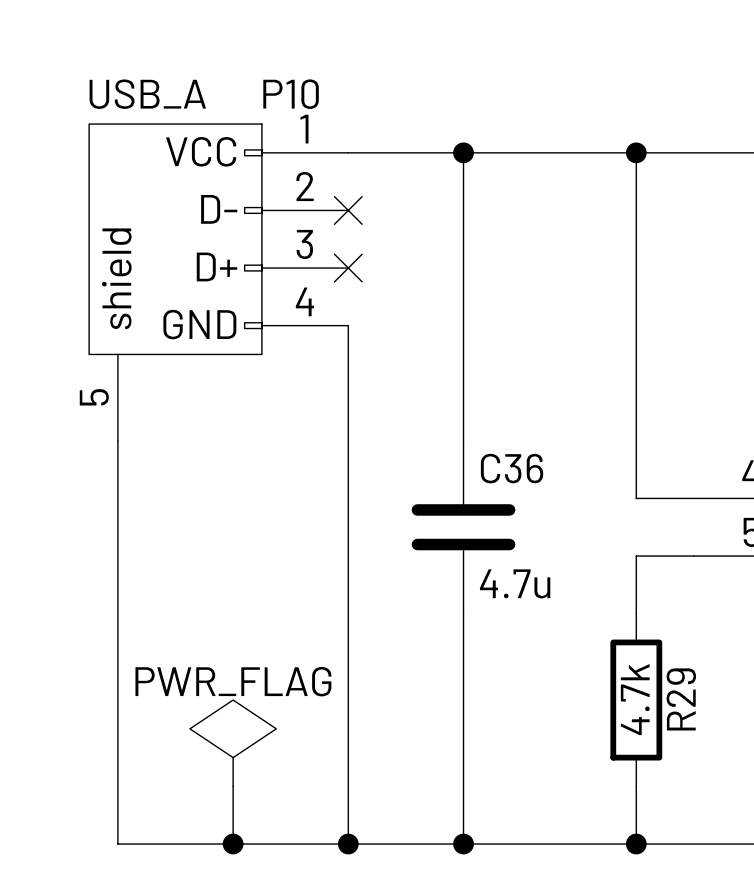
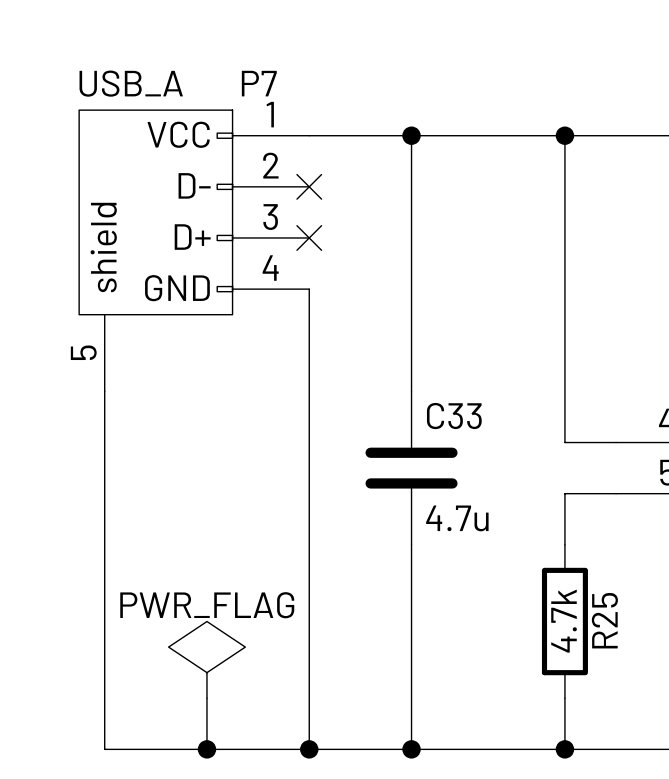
P10 name: P10 (291, 94) -> P7 (259, 83)
C36 name: C36 (512, 468) -> C33 (454, 416)
R29 name: R29 (681, 699) -> R25 (604, 620)

